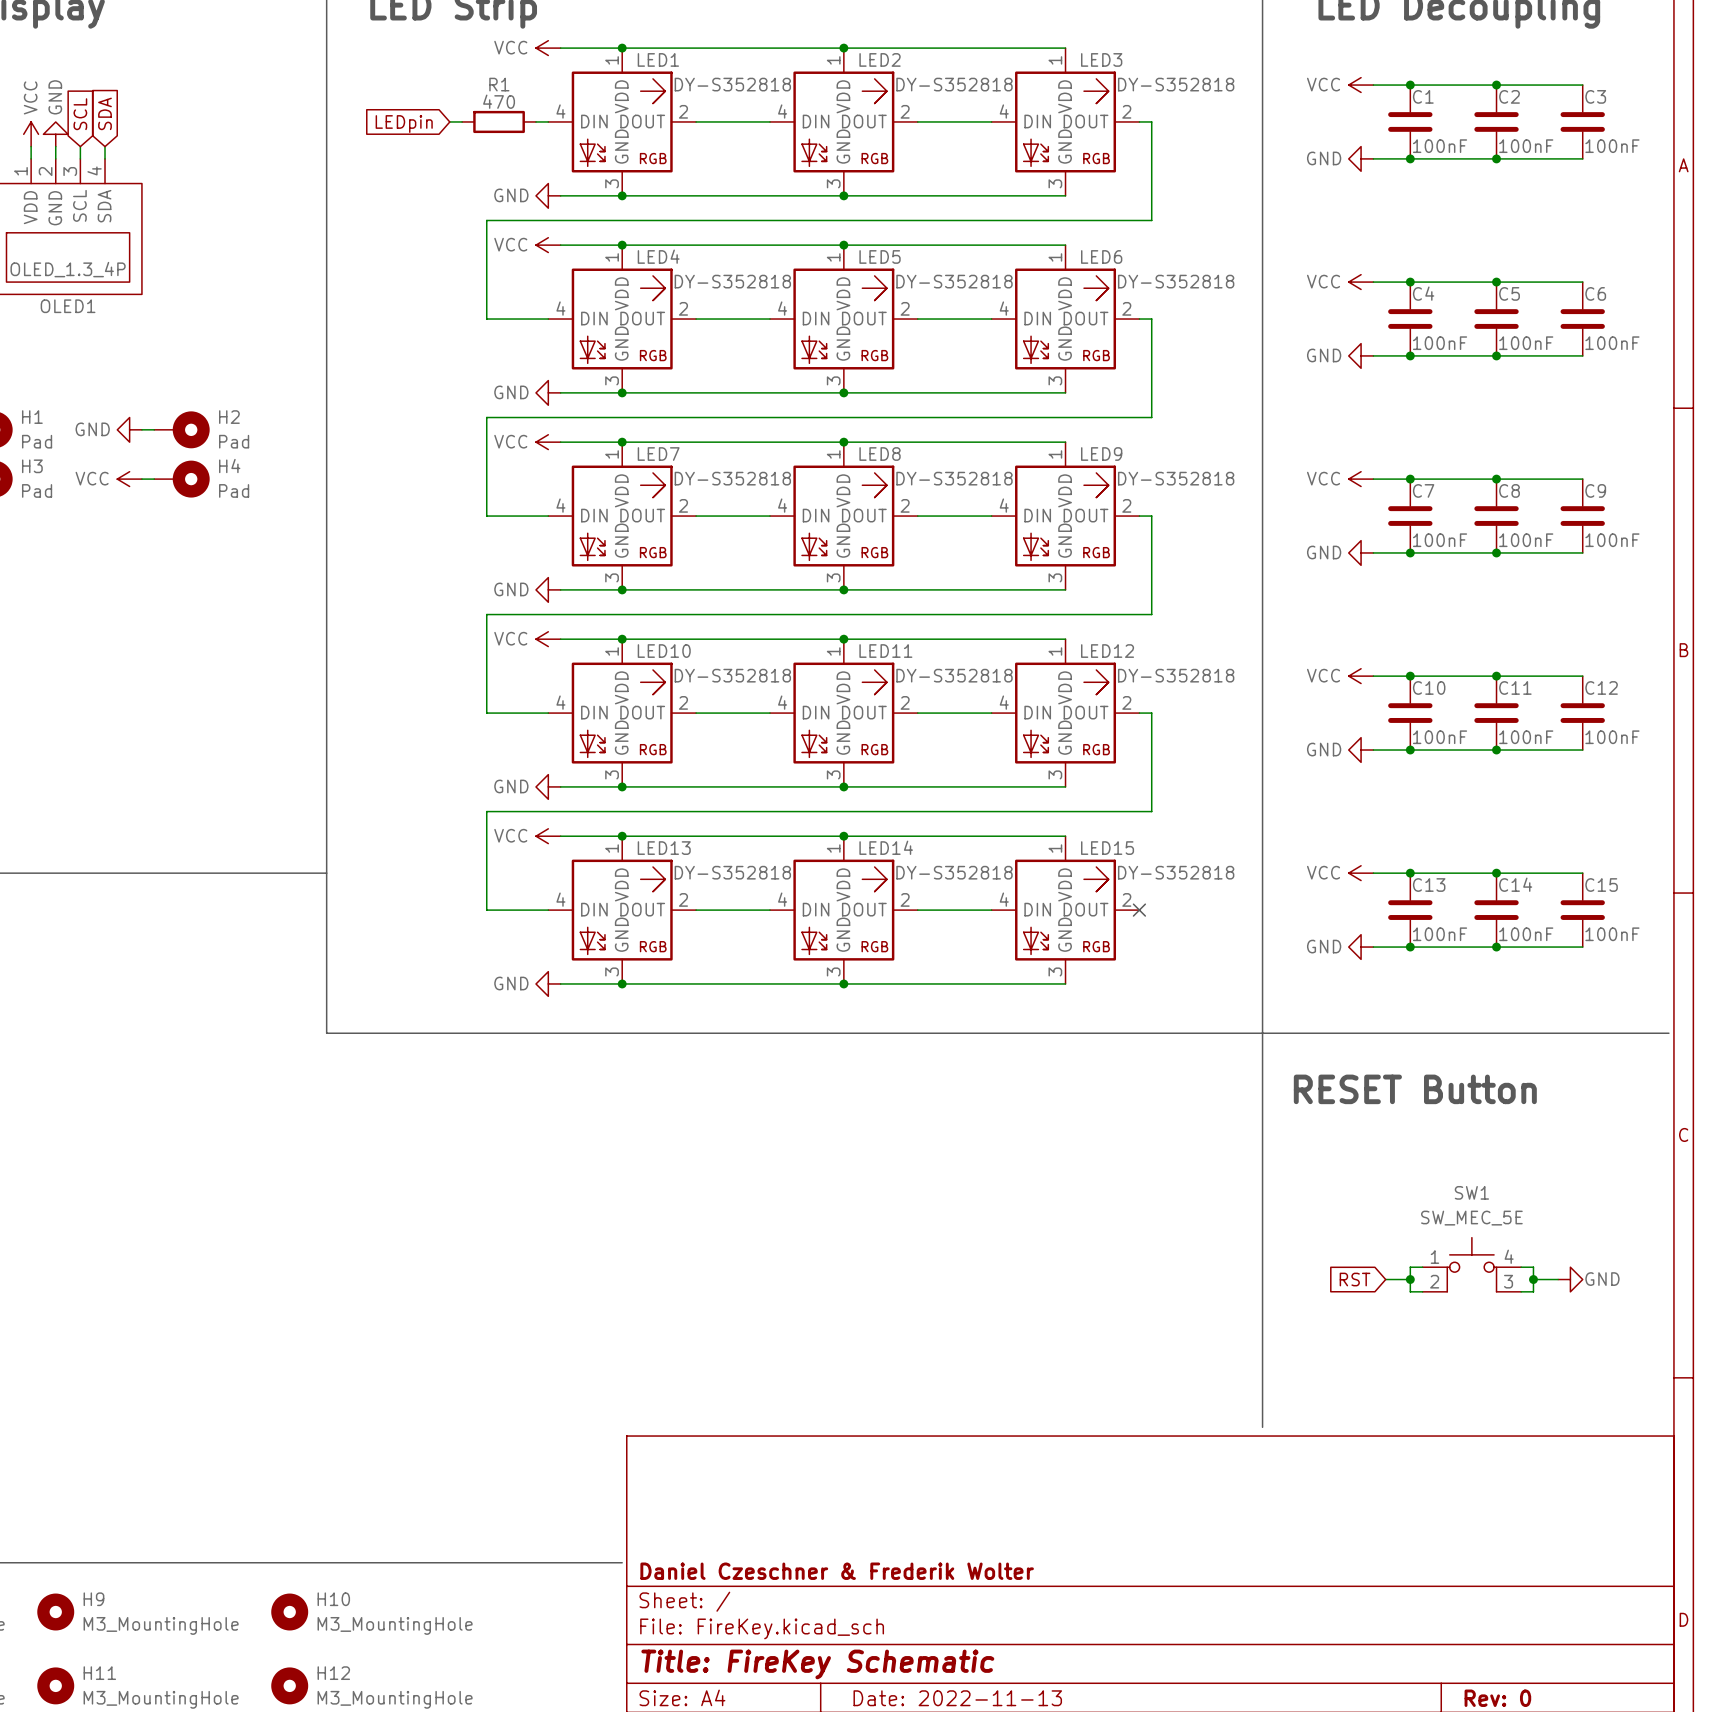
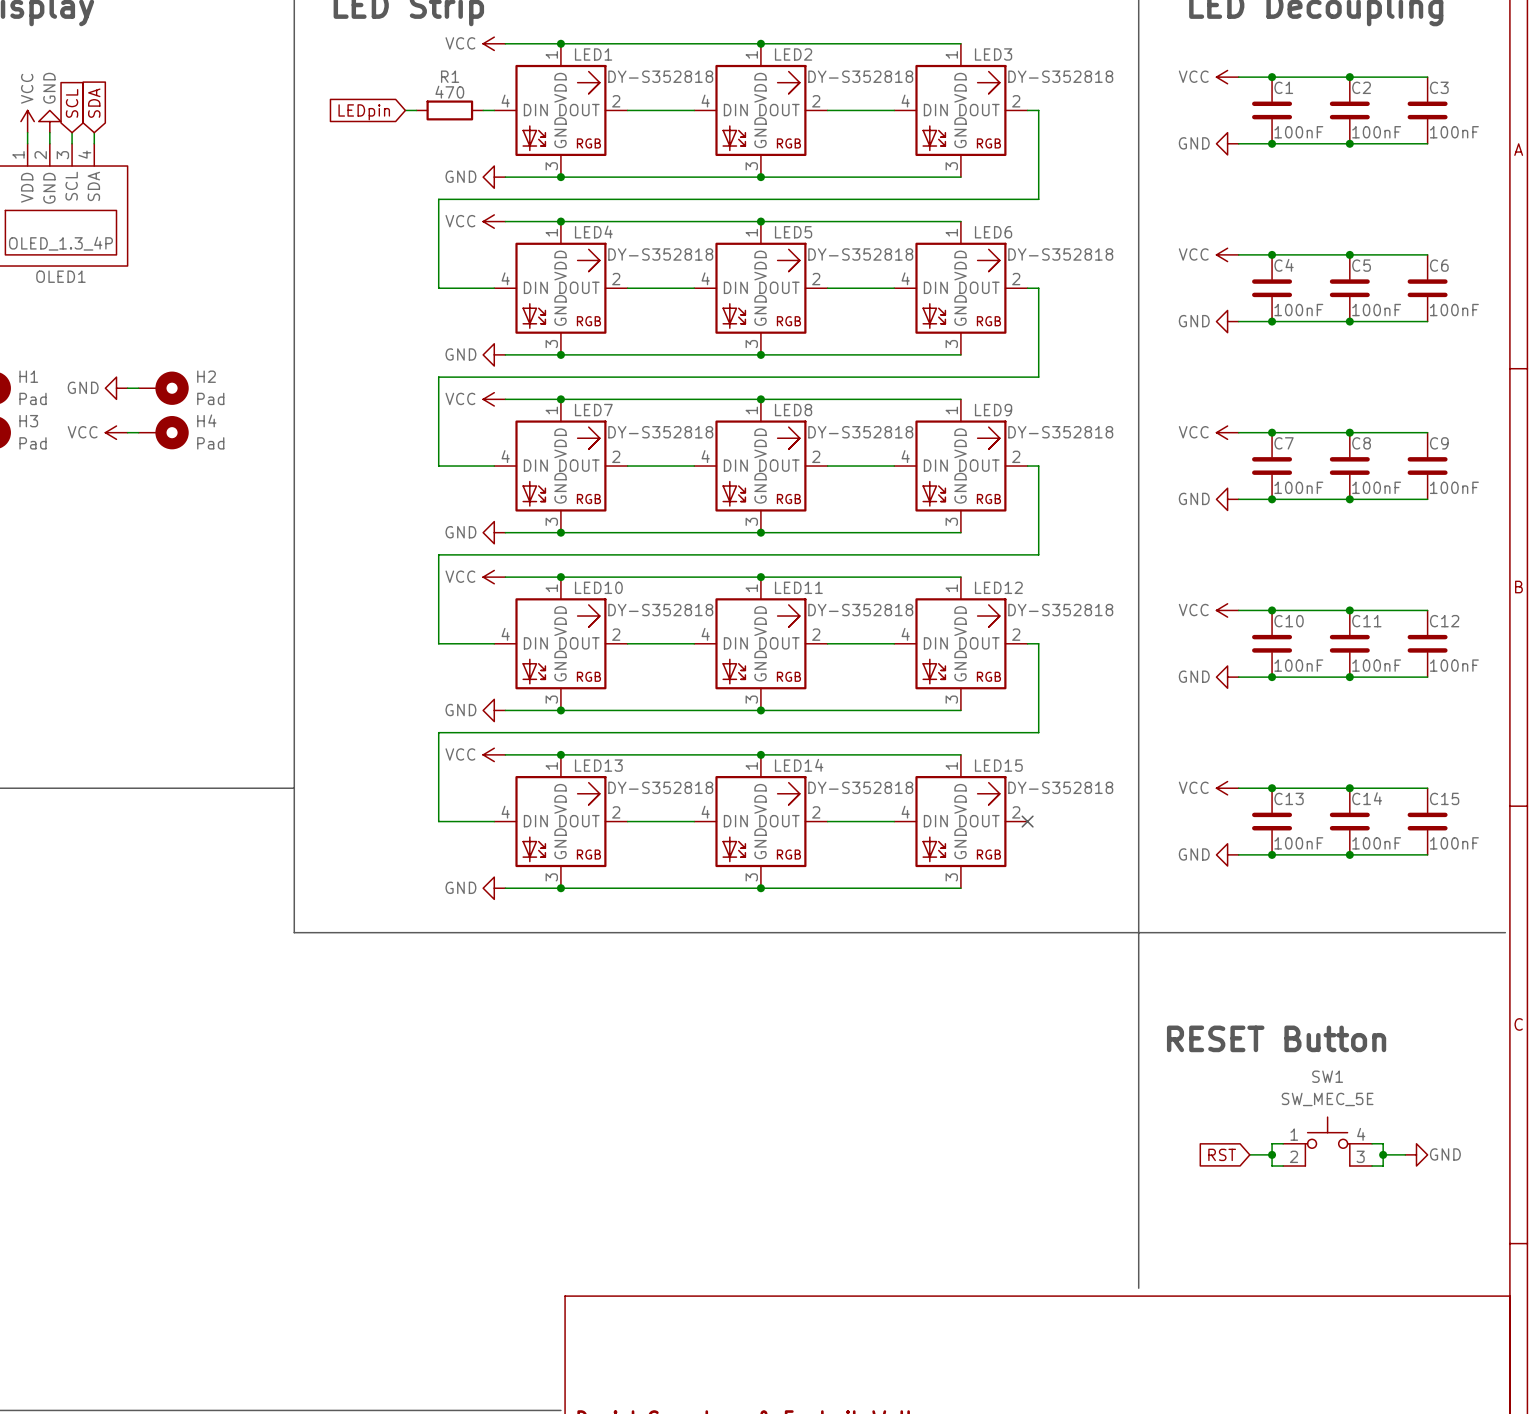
text position: RESET Button (1415, 1089) -> RESET Button (1276, 1038)

